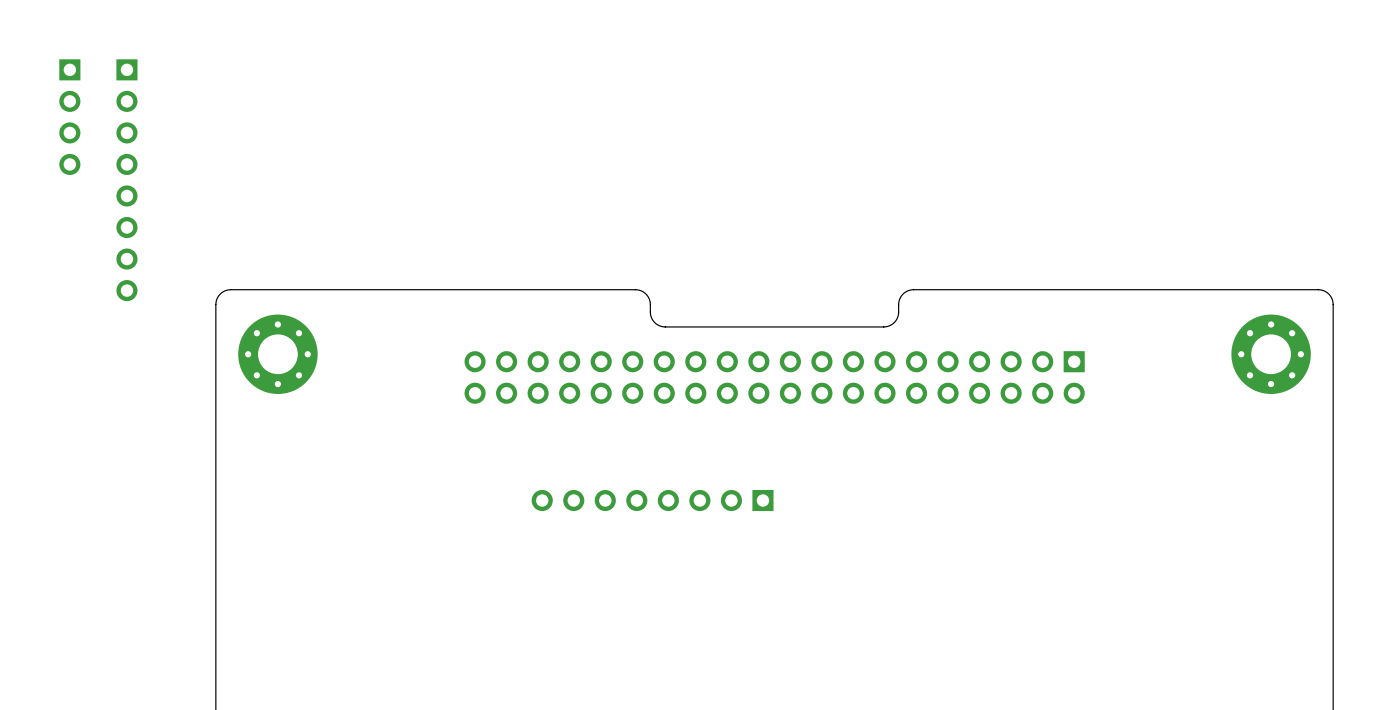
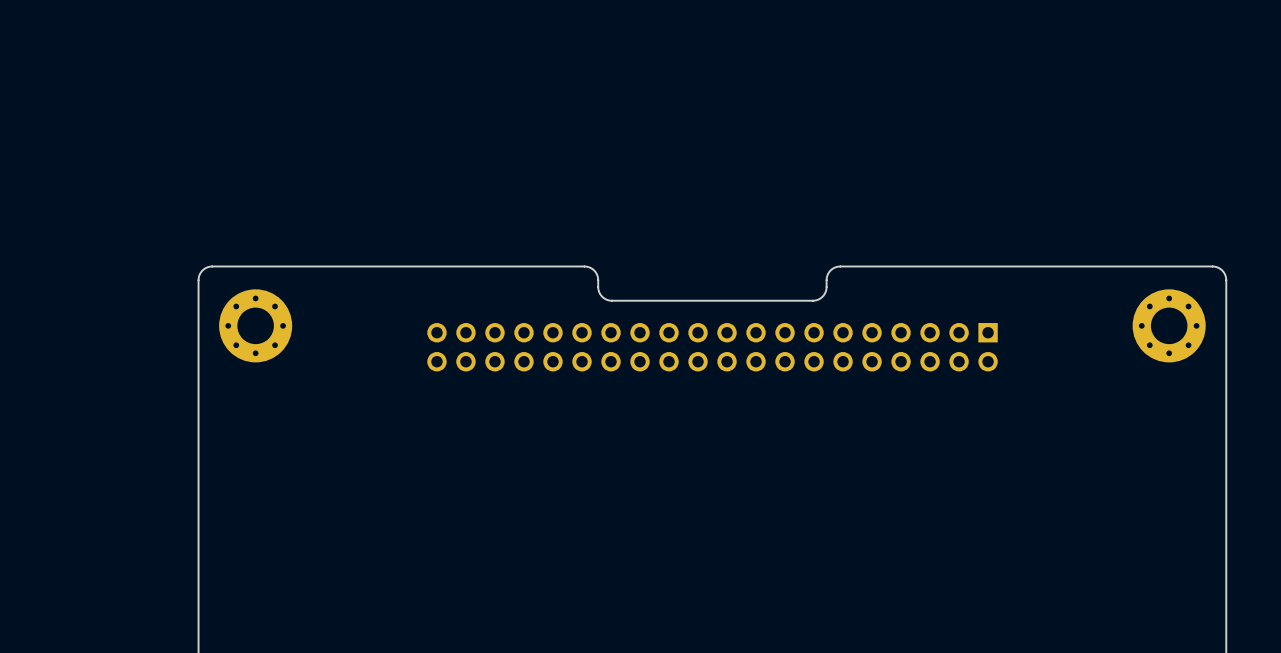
part: (69, 117) -> none
part: (126, 180) -> none
part: (652, 500) -> none

